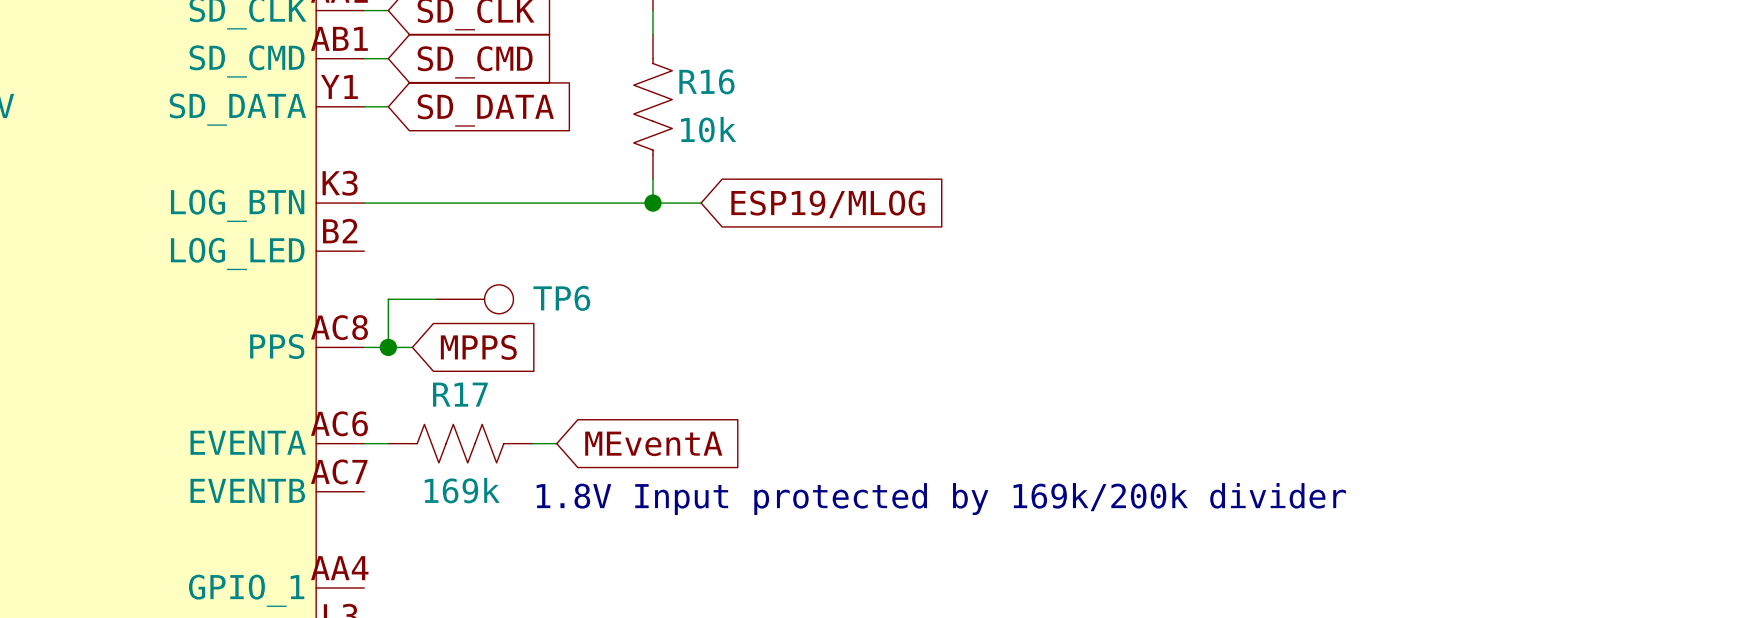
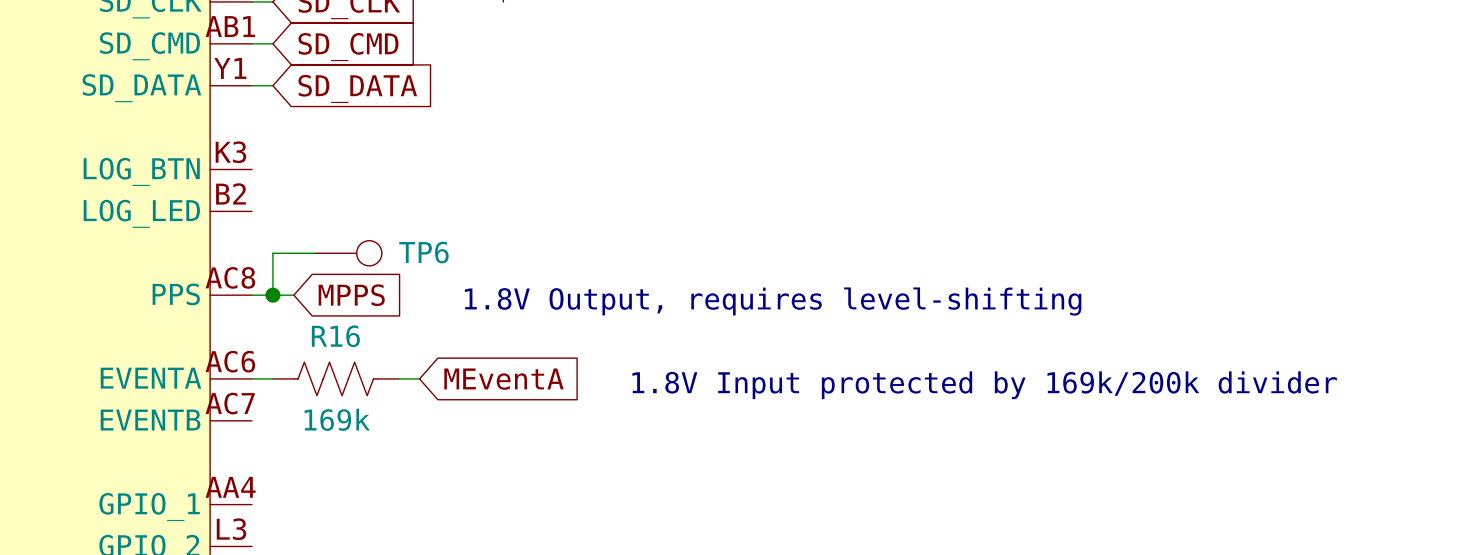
wire: (652, 10) (652, 34) -> none
R16: 10k (652, 106) -> none
wire: (652, 178) (652, 203) -> none
wire: (364, 203) (701, 203) -> none
junction: (652, 203) -> none
global label: ESP19/MLOG (828, 204) -> none
text: none -> 1.8V Output, requires level-shifting (773, 301)
R17 name: R17 (460, 394) -> R16 (335, 336)
text position: 1.8V Input protected by 169k/200k divider (941, 499) -> 1.8V Input protected by 169k/200k divider (984, 385)

